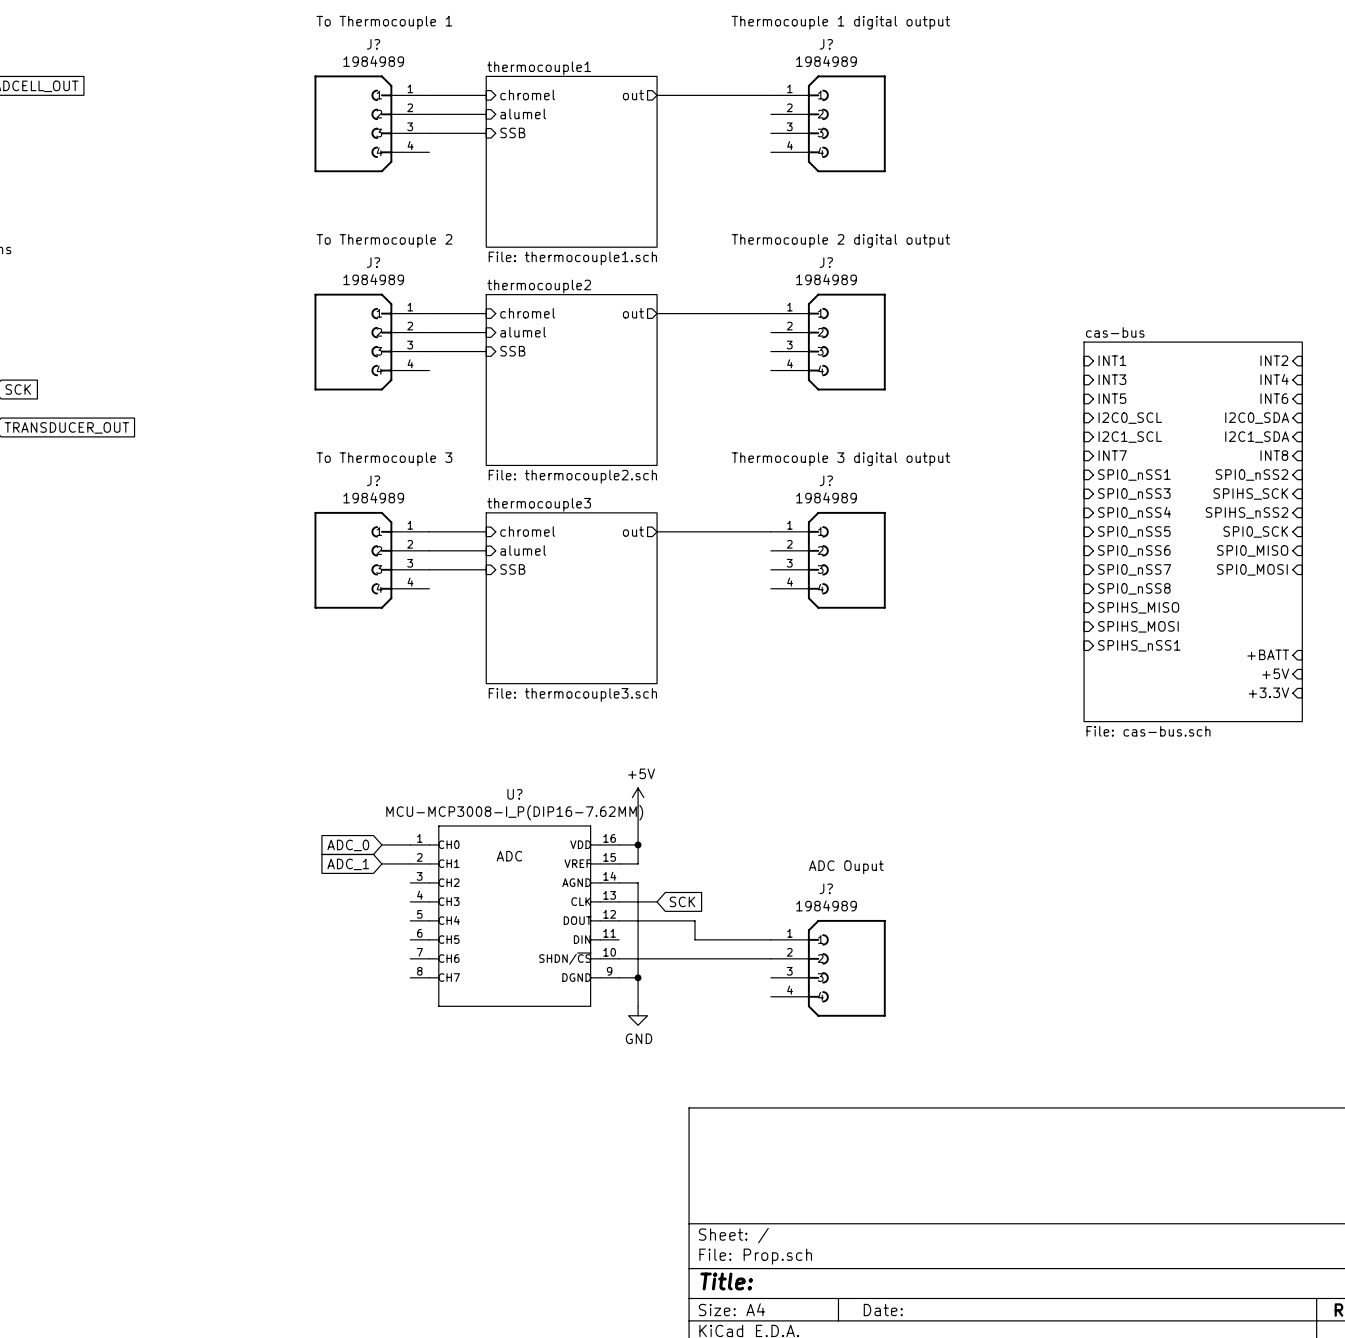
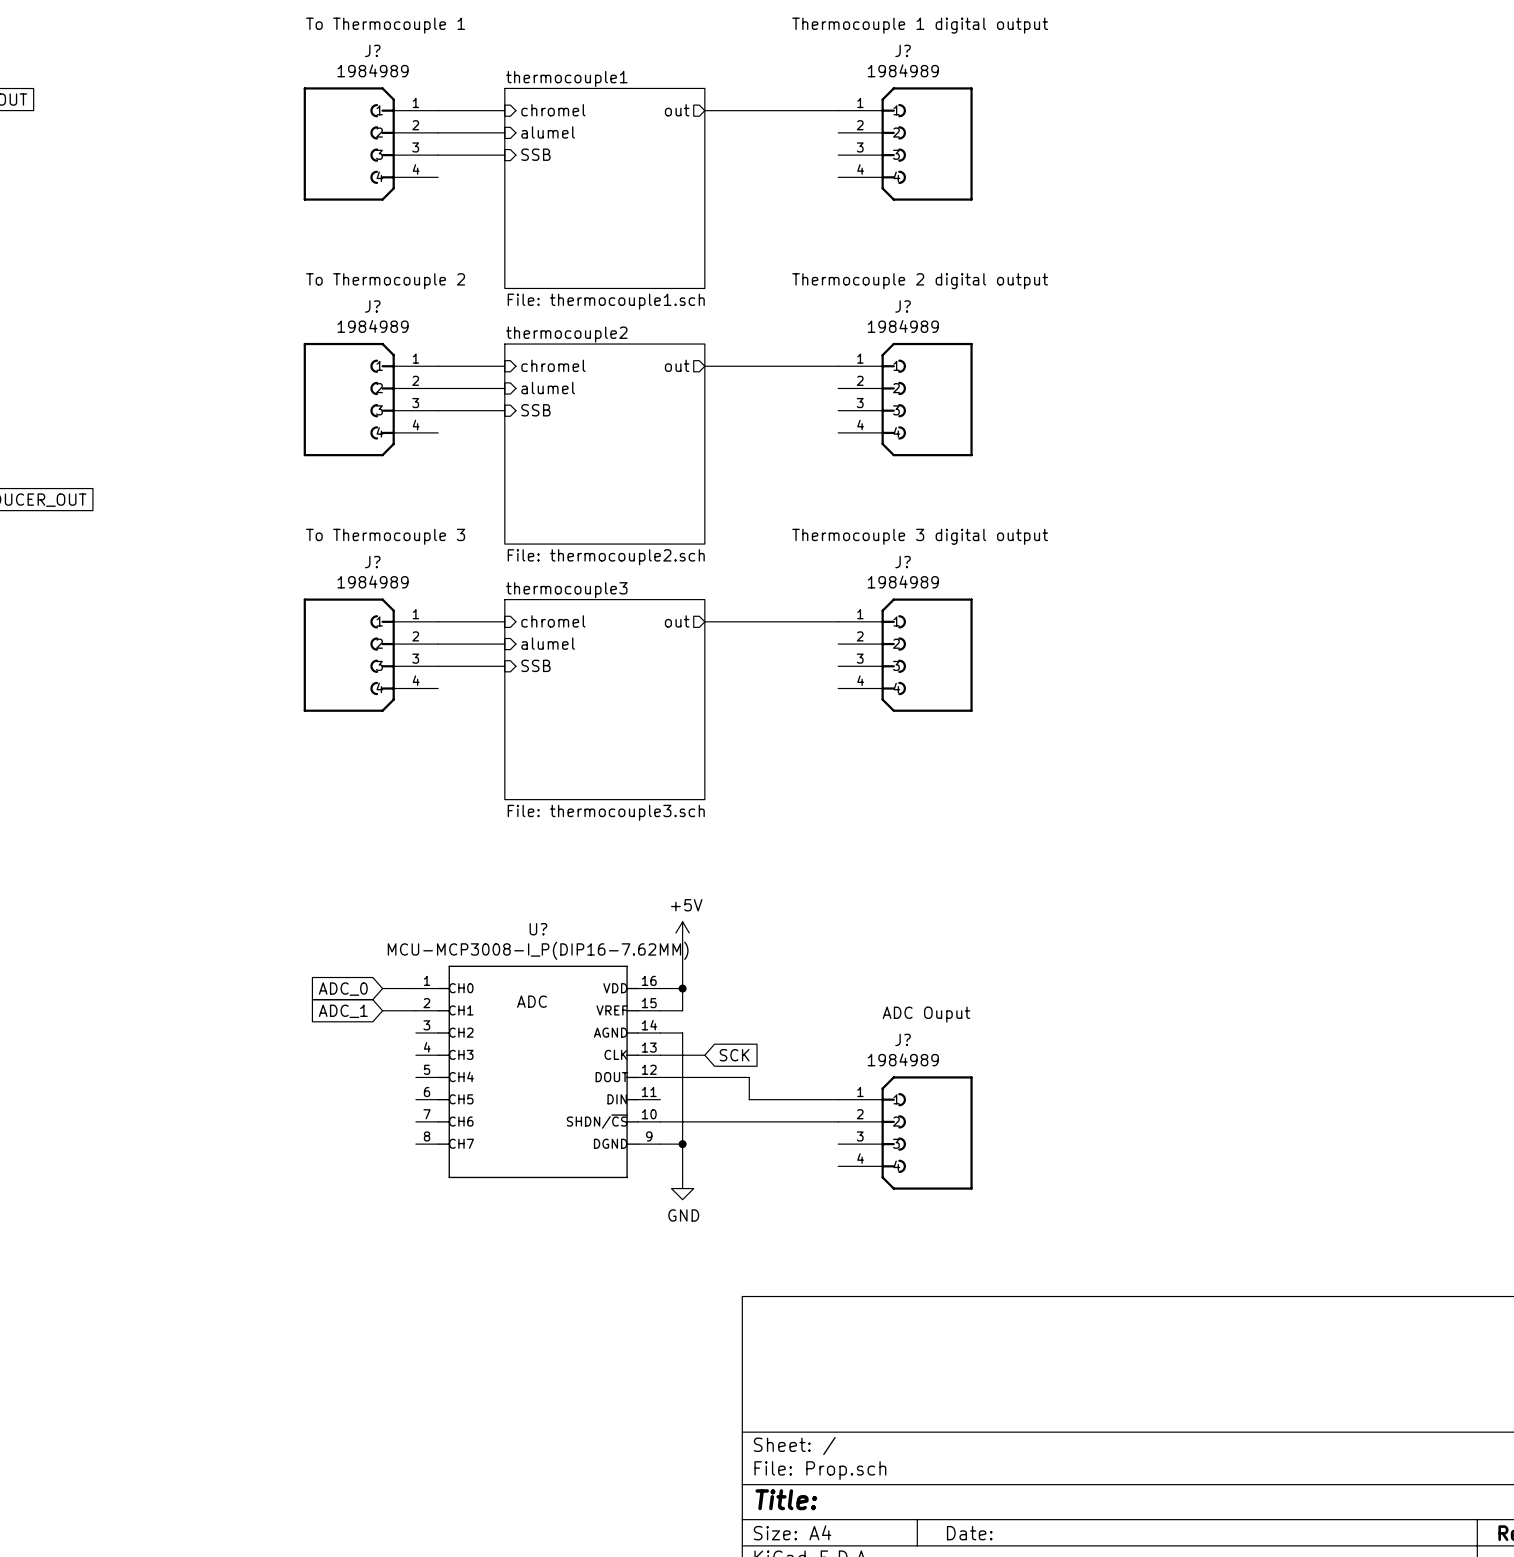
sheet pin: INT1 (1112, 360) -> none
sheet pin: INT2 (1274, 360) -> none
sheet pin: INT3 (1112, 379) -> none
sheet pin: INT4 (1274, 379) -> none
sheet pin: INT5 (1112, 398) -> none
sheet pin: INT6 (1274, 398) -> none
sheet pin: I2C0_SCL (1130, 418) -> none
sheet pin: I2C0_SDA (1257, 418) -> none
sheet pin: I2C1_SCL (1130, 437) -> none
sheet pin: I2C1_SDA (1257, 437) -> none
sheet pin: INT7 (1112, 455) -> none
sheet pin: INT8 (1274, 455) -> none
sheet pin: SPI0_nSS1 (1134, 475) -> none
sheet pin: SPI0_nSS2 (1251, 475) -> none
sheet pin: SPI0_nSS3 (1134, 493) -> none
sheet pin: SPIHS_SCK (1250, 493) -> none
sheet pin: SPI0_nSS4 (1134, 512) -> none
sheet pin: SPIHS_nSS2 (1247, 512) -> none
sheet pin: SPI0_nSS5 (1134, 531) -> none
sheet cas-bus: File: cas-bus.sch (1193, 531) -> none
sheet pin: SPI0_SCK (1255, 531) -> none
sheet pin: SPI0_nSS6 (1134, 550) -> none
sheet pin: SPI0_MISO (1252, 550) -> none
sheet pin: SPI0_nSS7 (1134, 569) -> none
sheet pin: SPI0_MOSI (1252, 569) -> none
sheet pin: SPI0_nSS8 (1134, 588) -> none
sheet pin: SPIHS_MISO (1138, 607) -> none
sheet pin: SPIHS_MOSI (1138, 626) -> none
sheet pin: SPIHS_nSS1 (1139, 645) -> none
sheet pin: +BATT (1268, 654) -> none
sheet pin: +5V (1275, 673) -> none
sheet pin: +3.3V (1268, 692) -> none

